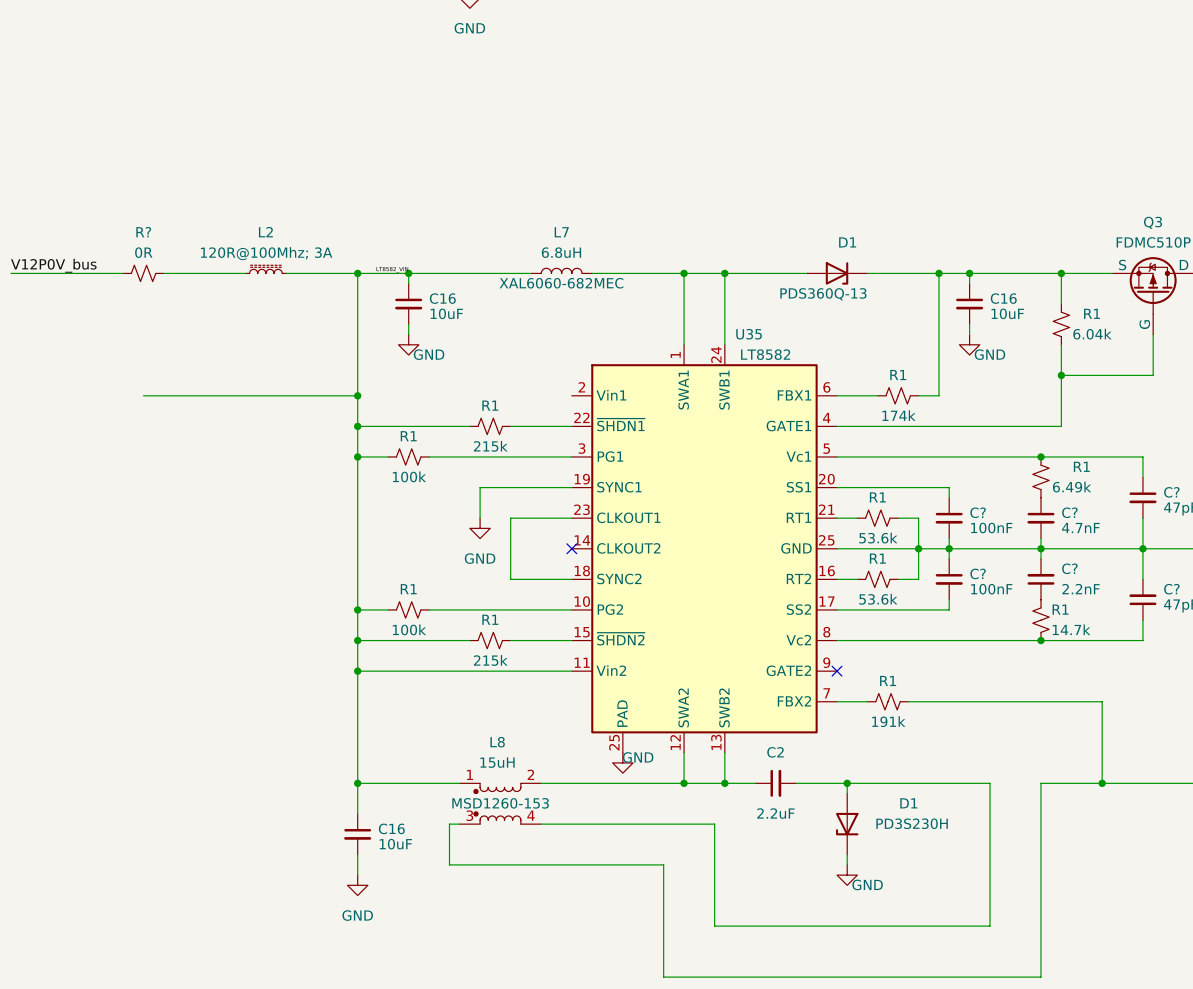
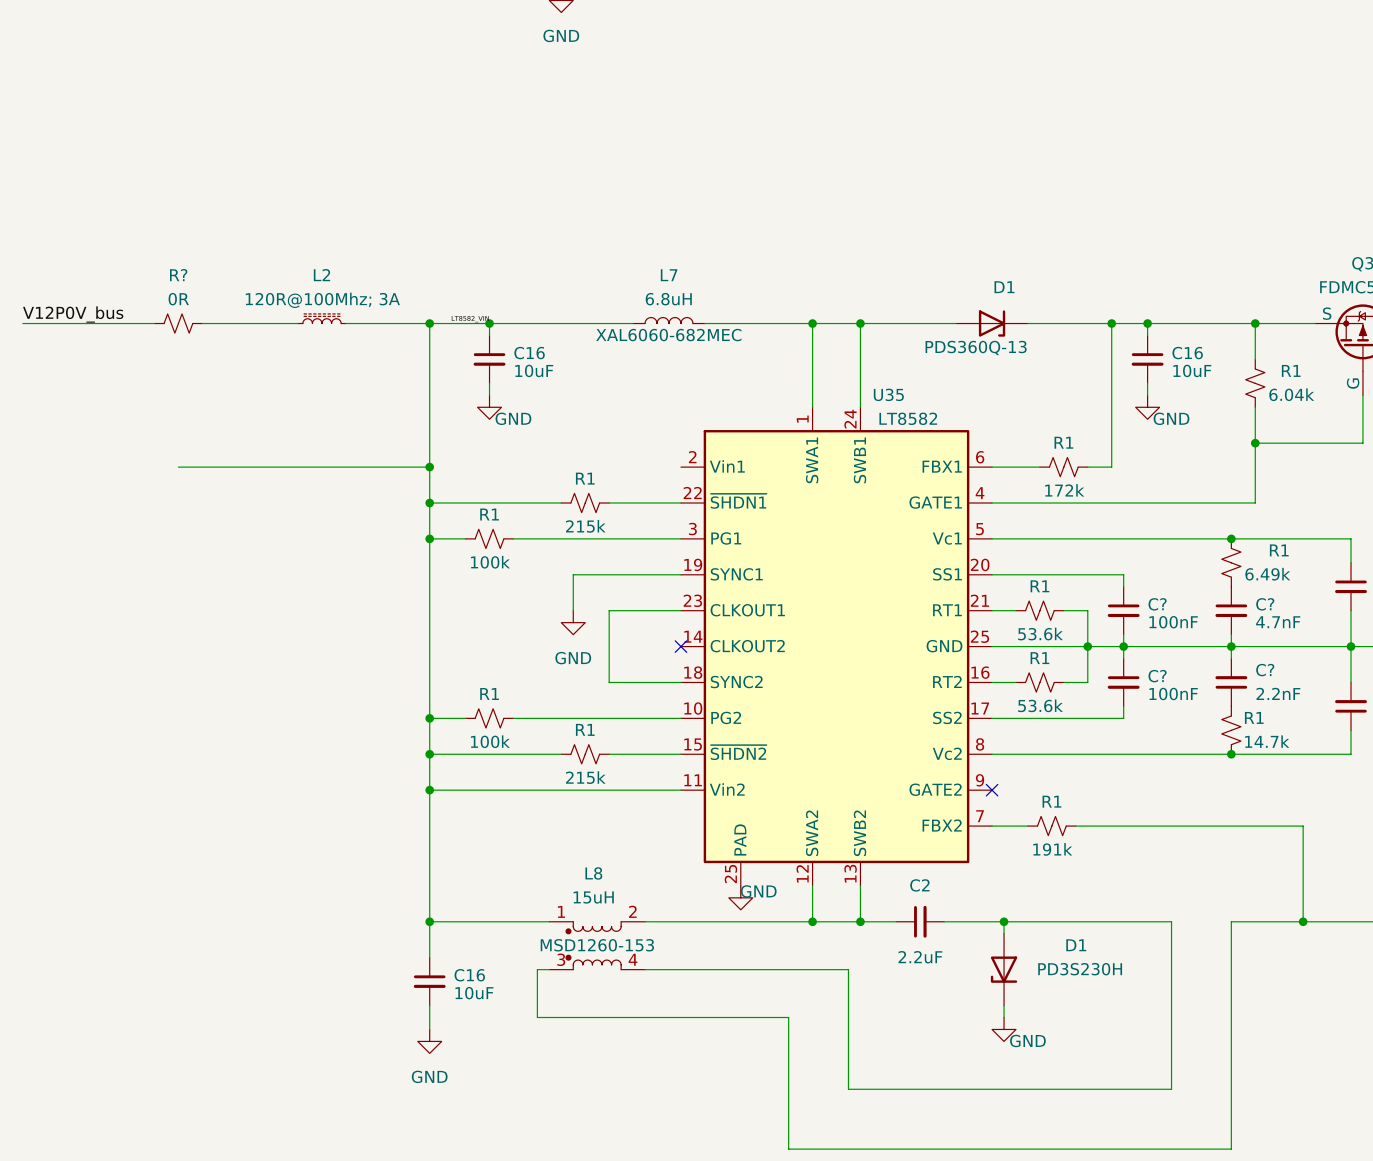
R1 value: 174k (898, 415) -> 172k (1064, 490)

